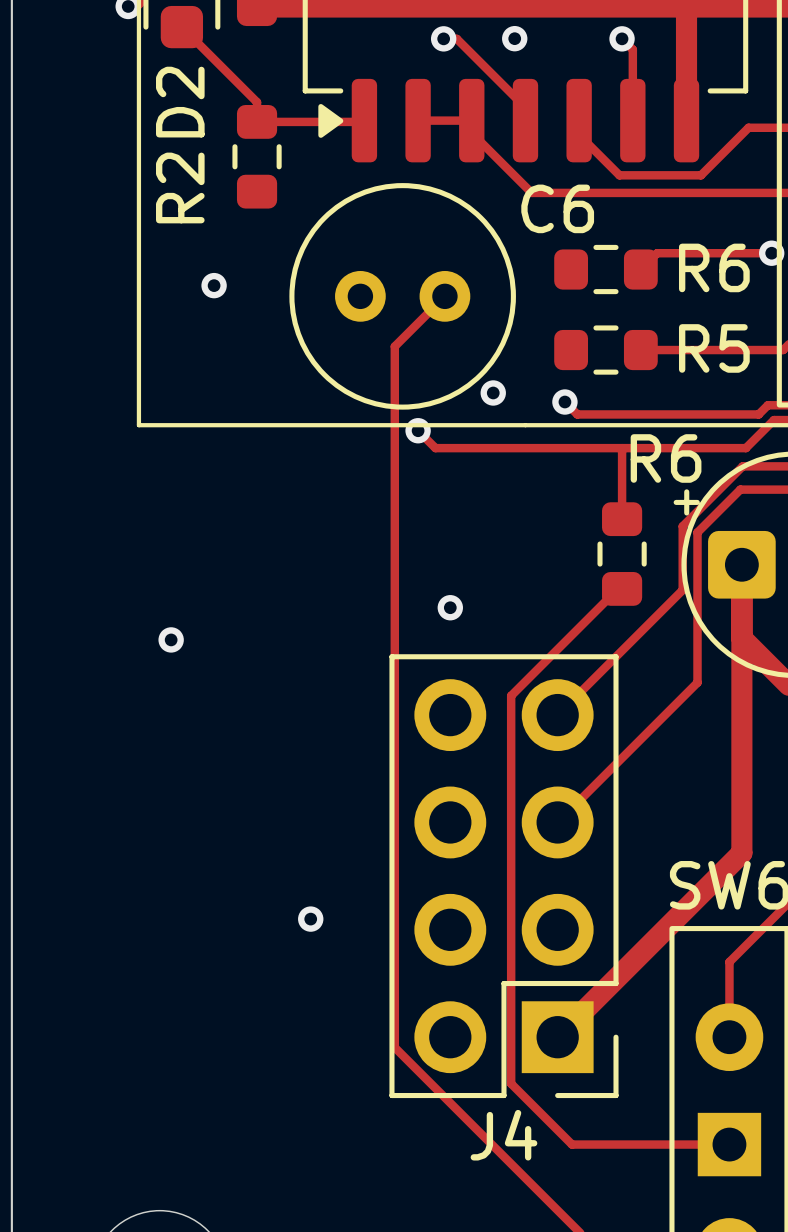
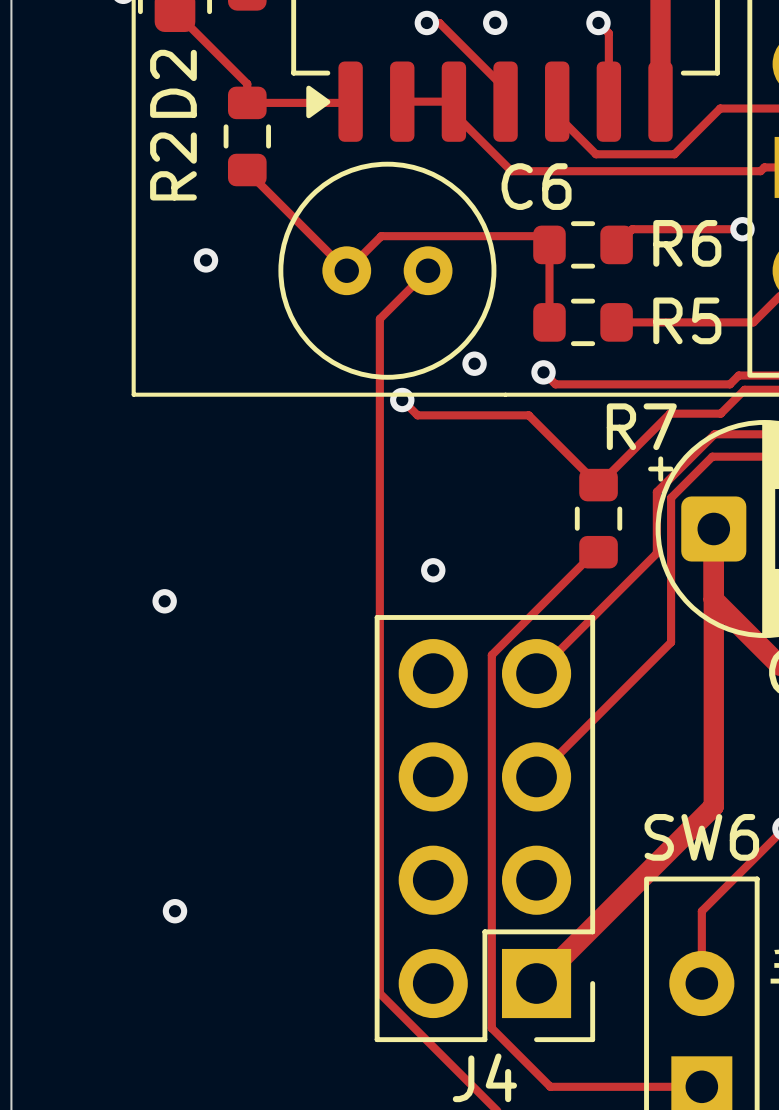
track: none -> (247, 170) (346, 270) (381, 236) (540, 236) (549, 244) (549, 322)
track: (749, 444) (745, 448) (434, 446) -> (720, 413) (669, 413) (598, 485) (528, 415) (417, 415)
track: (622, 448) (622, 519) -> none
R6 name: R6 (666, 458) -> R7 (641, 426)
via position: (310, 919) -> (175, 911)

